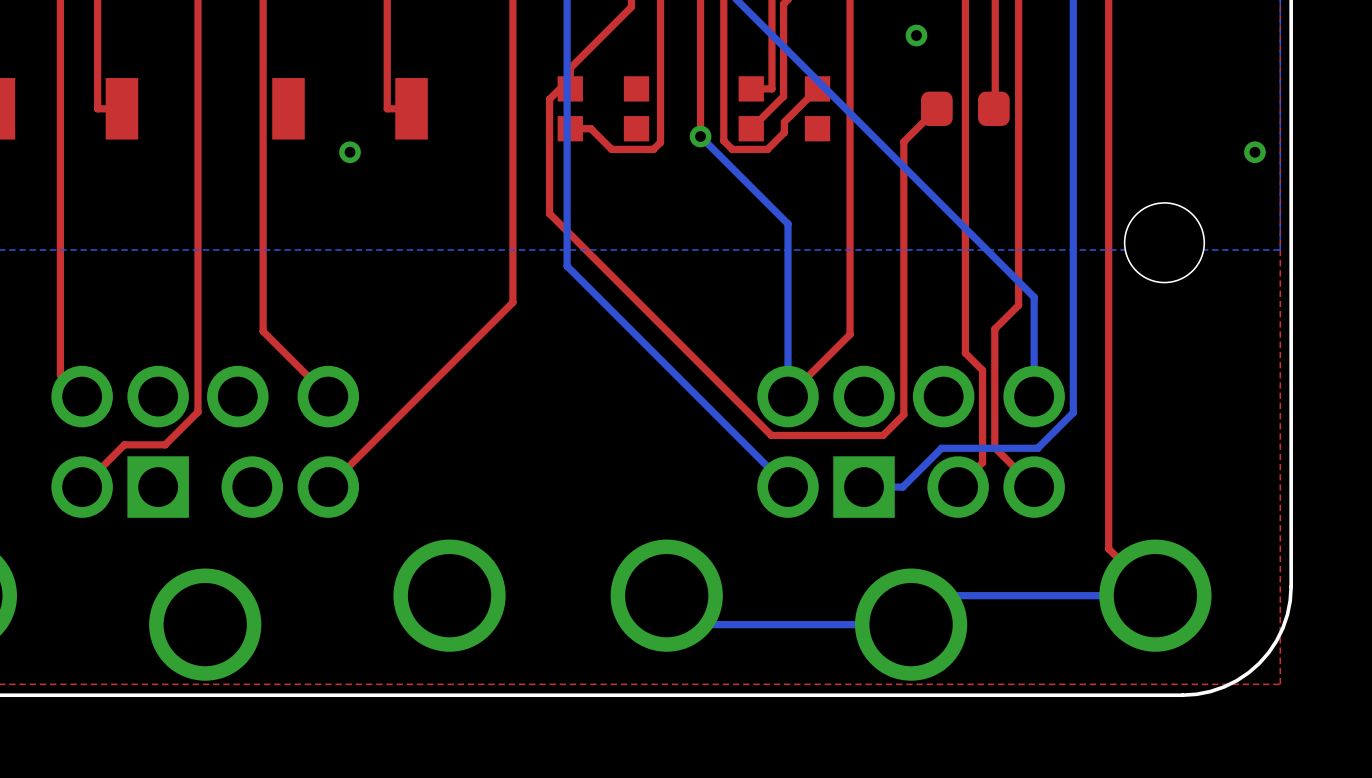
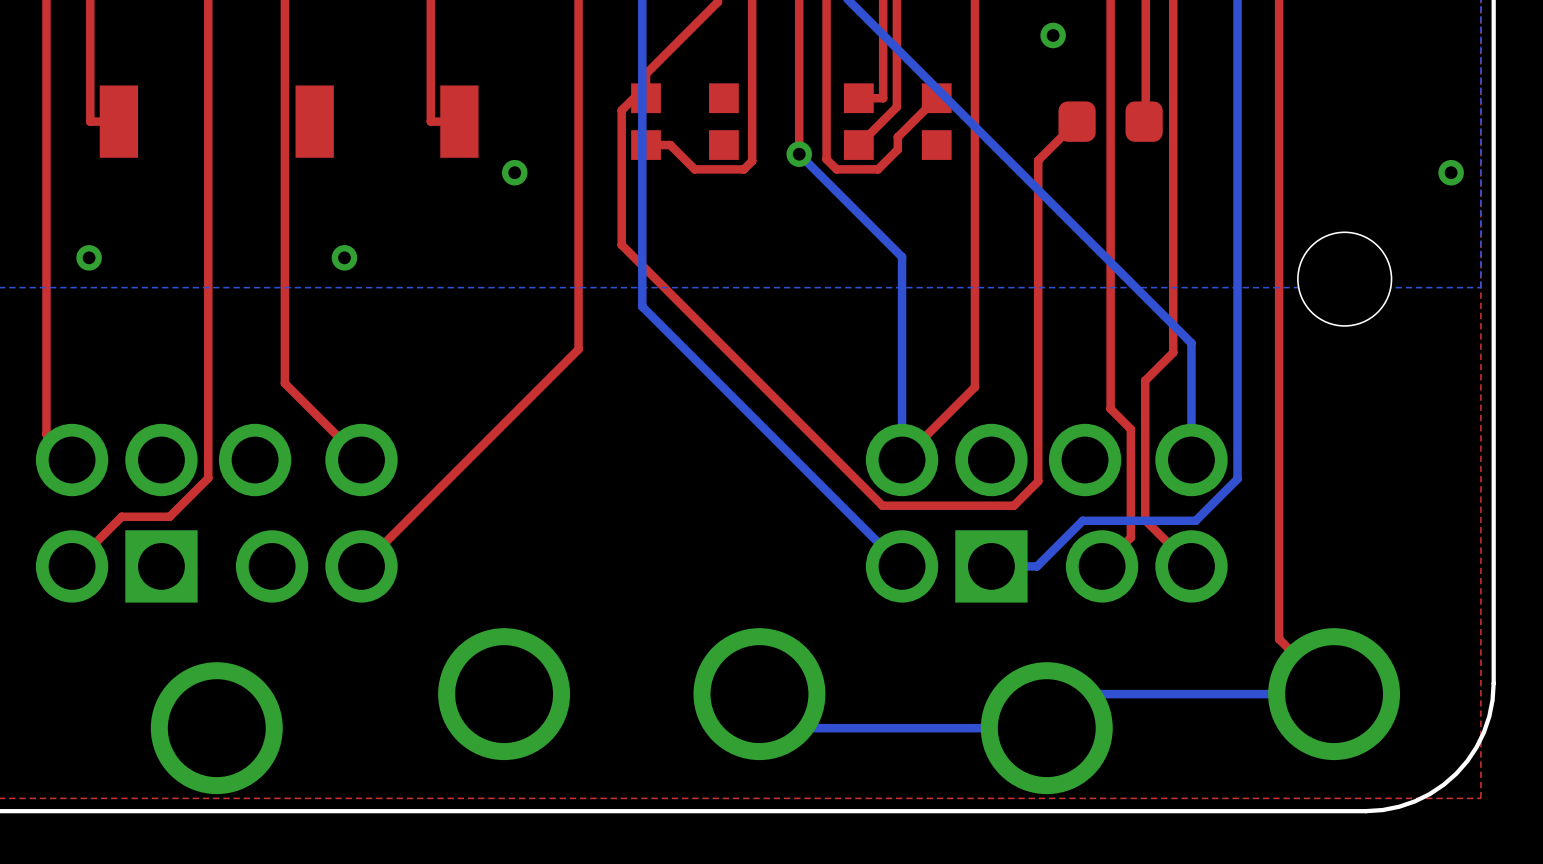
via: (350, 152) -> none
via: none -> (514, 172)
via: none -> (89, 257)
via: none -> (344, 257)

